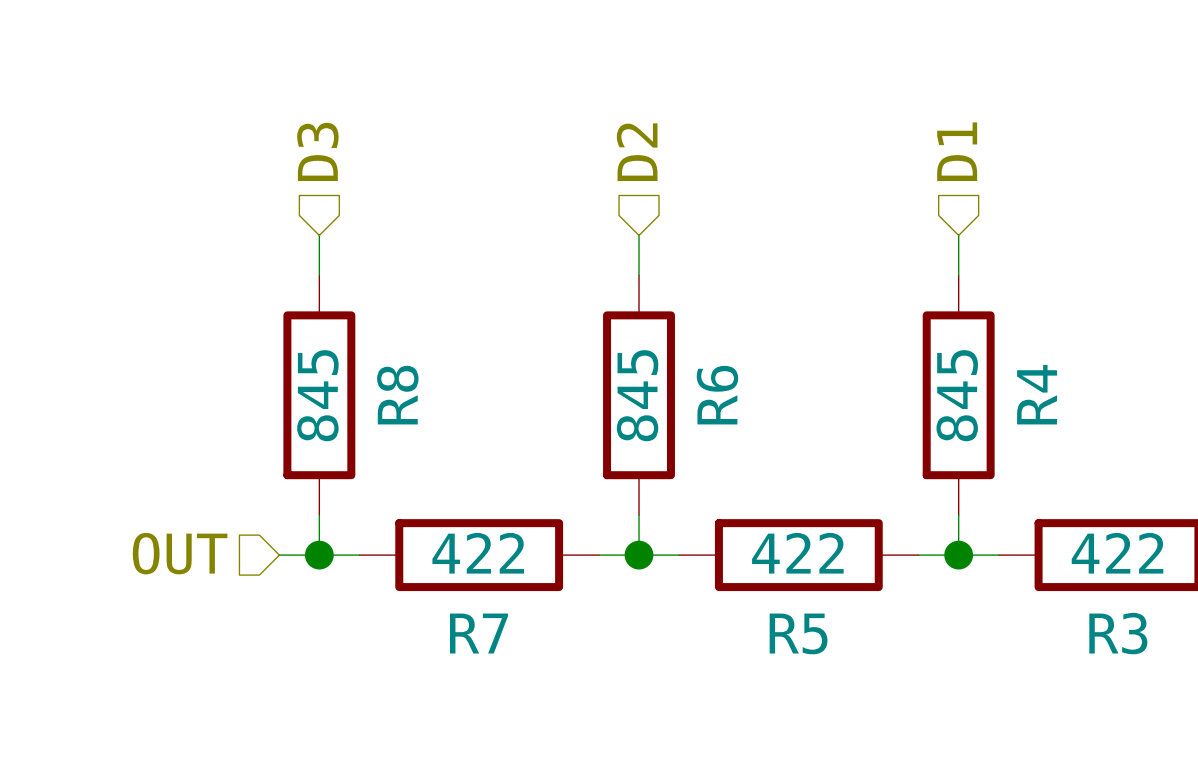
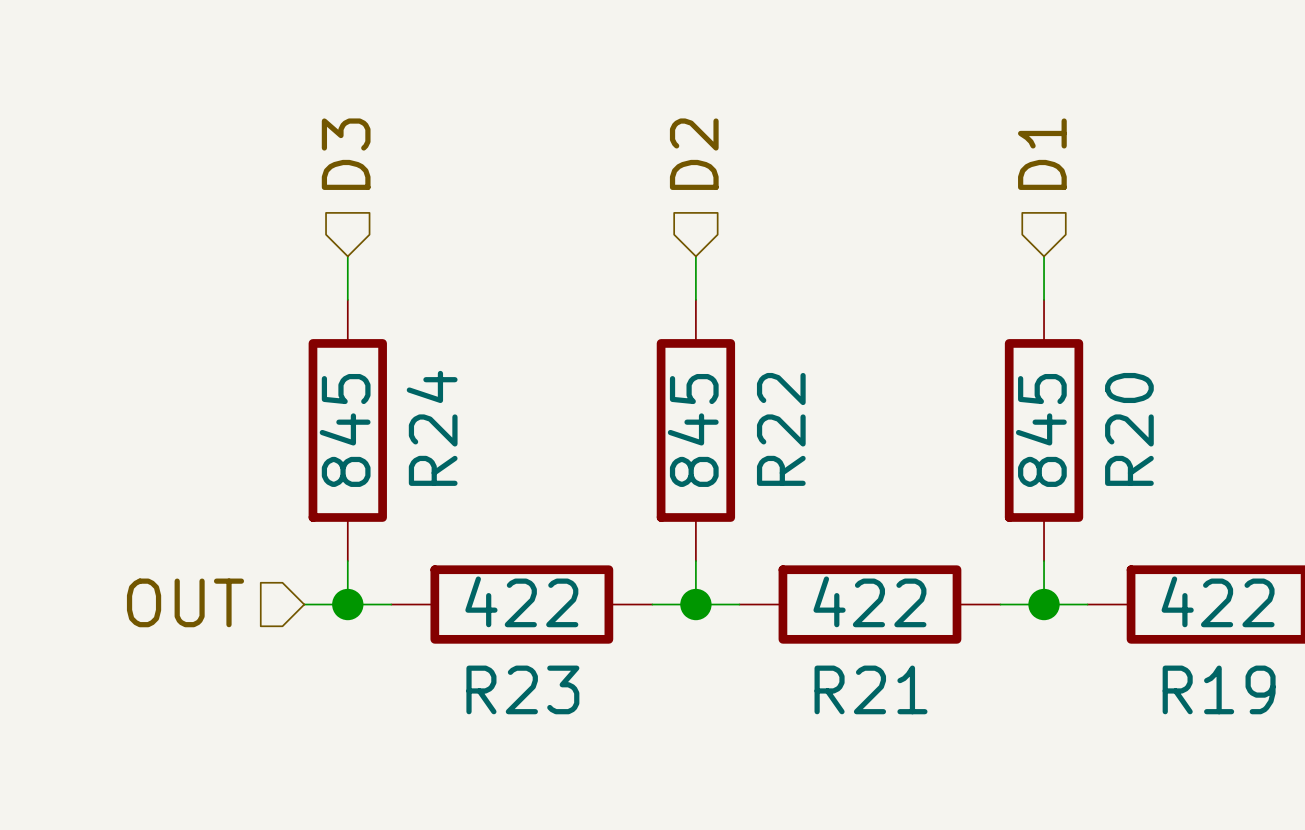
R4 name: R4 (1037, 394) -> R20 (1129, 429)
R8 name: R8 (397, 395) -> R24 (432, 428)
R6 name: R6 (717, 395) -> R22 (781, 429)
R7 name: R7 (479, 633) -> R23 (522, 689)
R5 name: R5 (798, 633) -> R21 (871, 689)
R3 name: R3 (1118, 633) -> R19 (1219, 689)

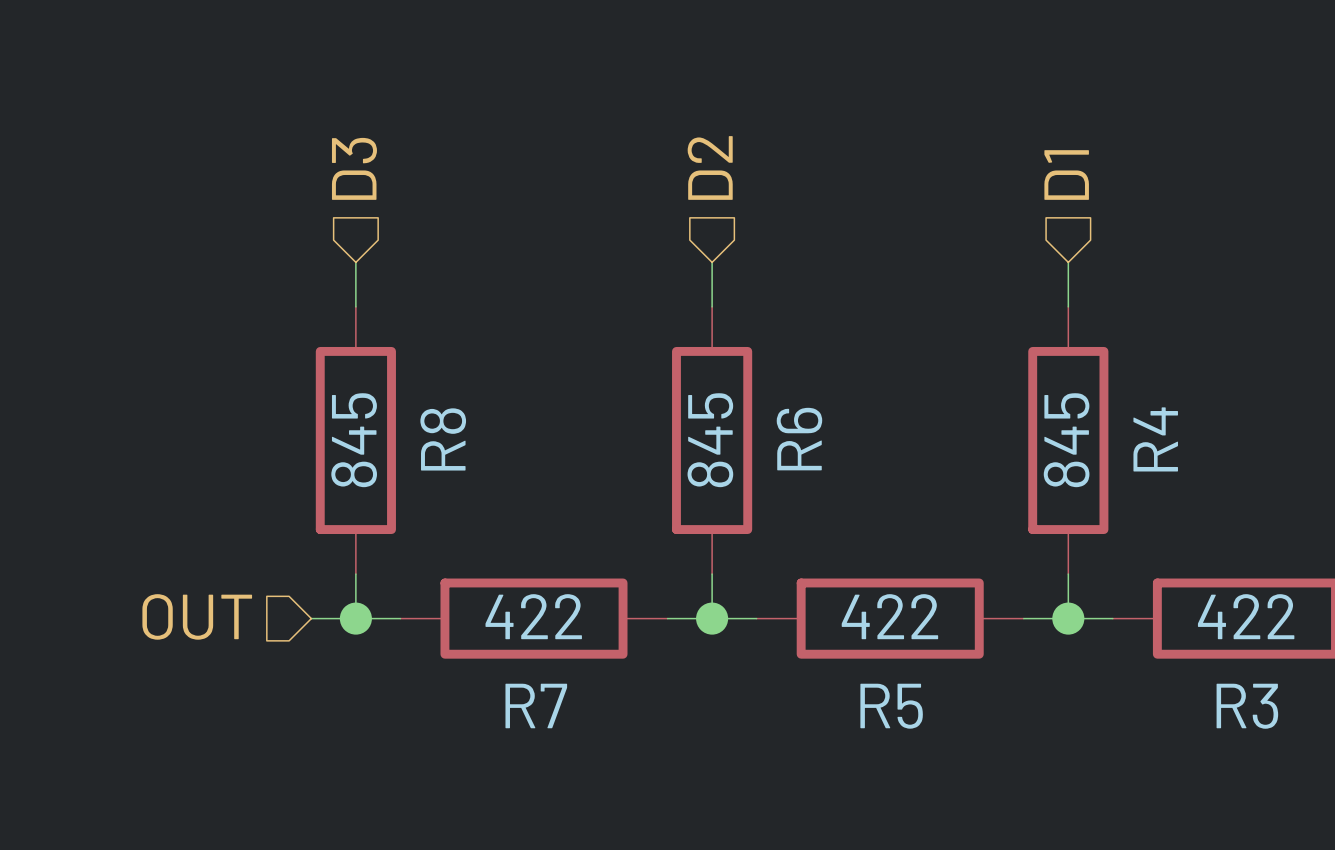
R24 name: R24 (432, 428) -> R8 (443, 439)
R22 name: R22 (781, 429) -> R6 (799, 439)
R20 name: R20 (1129, 429) -> R4 (1155, 439)
R23 name: R23 (522, 689) -> R7 (536, 705)
R21 name: R21 (871, 689) -> R5 (891, 706)
R19 name: R19 (1219, 689) -> R3 (1247, 706)

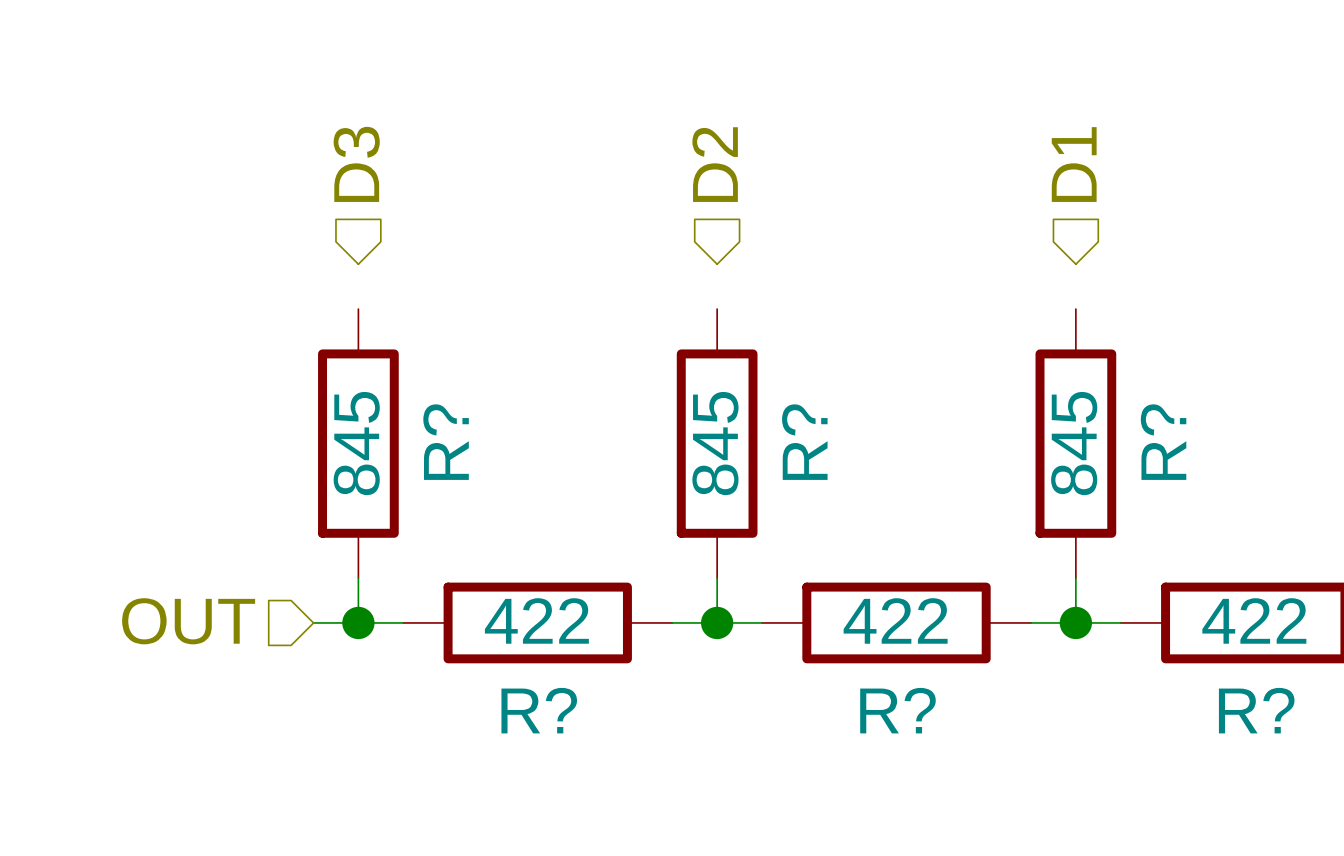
wire: (355, 262) (355, 306) -> none
wire: (712, 262) (712, 306) -> none
wire: (1068, 262) (1068, 306) -> none
R8 name: R8 (443, 439) -> R? (446, 442)
R6 name: R6 (799, 439) -> R? (804, 442)
R4 name: R4 (1155, 439) -> R? (1163, 442)
R7 name: R7 (536, 705) -> R? (539, 710)
R5 name: R5 (891, 706) -> R? (897, 710)
R3 name: R3 (1247, 706) -> R? (1256, 710)

